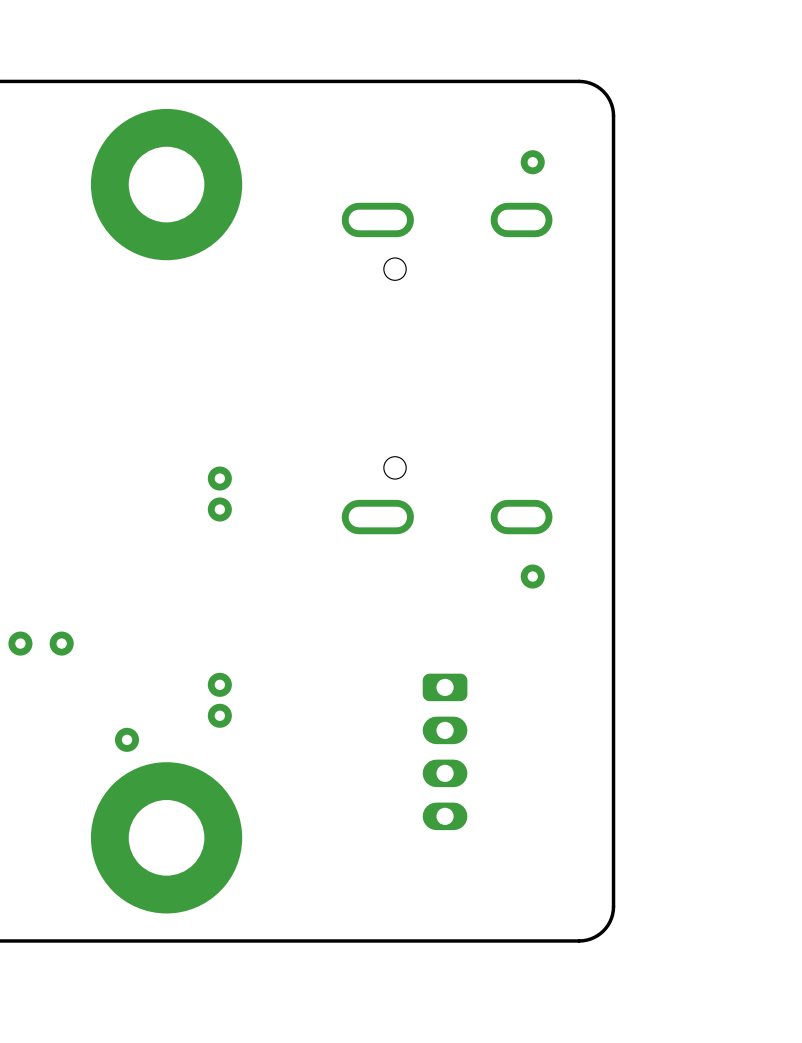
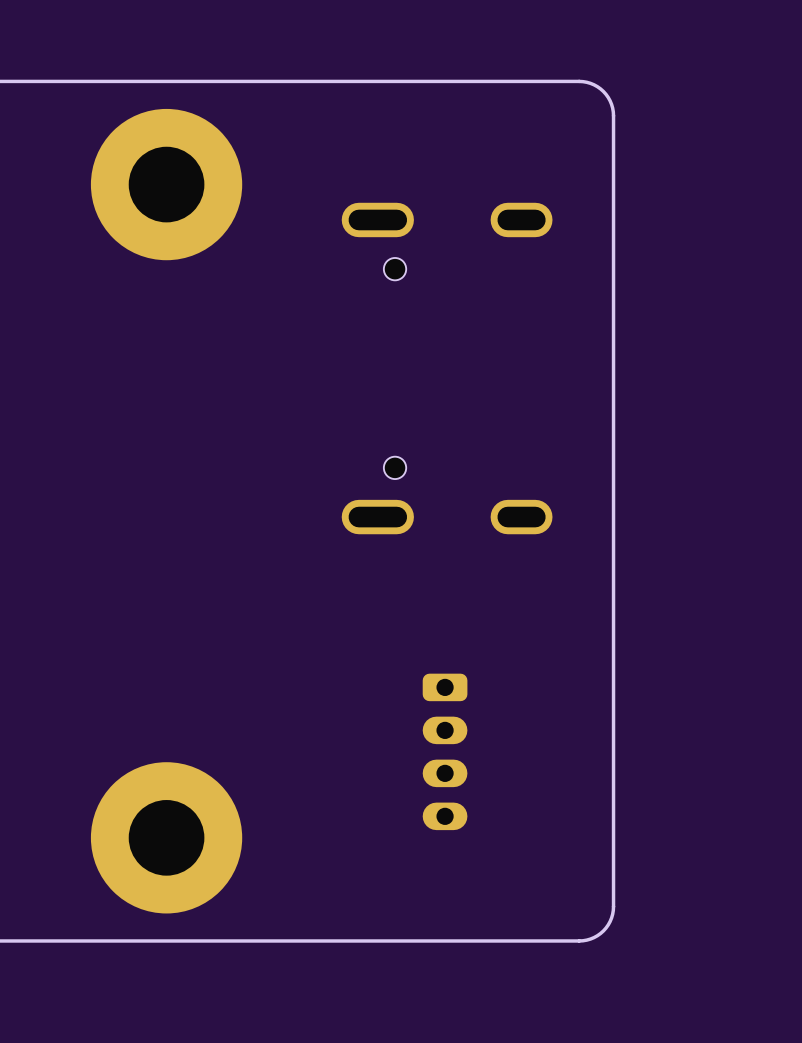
via: (532, 162) -> none
via: (219, 478) -> none
via: (219, 509) -> none
via: (532, 576) -> none
via: (20, 643) -> none
via: (61, 643) -> none
via: (219, 684) -> none
via: (219, 715) -> none
via: (127, 739) -> none

